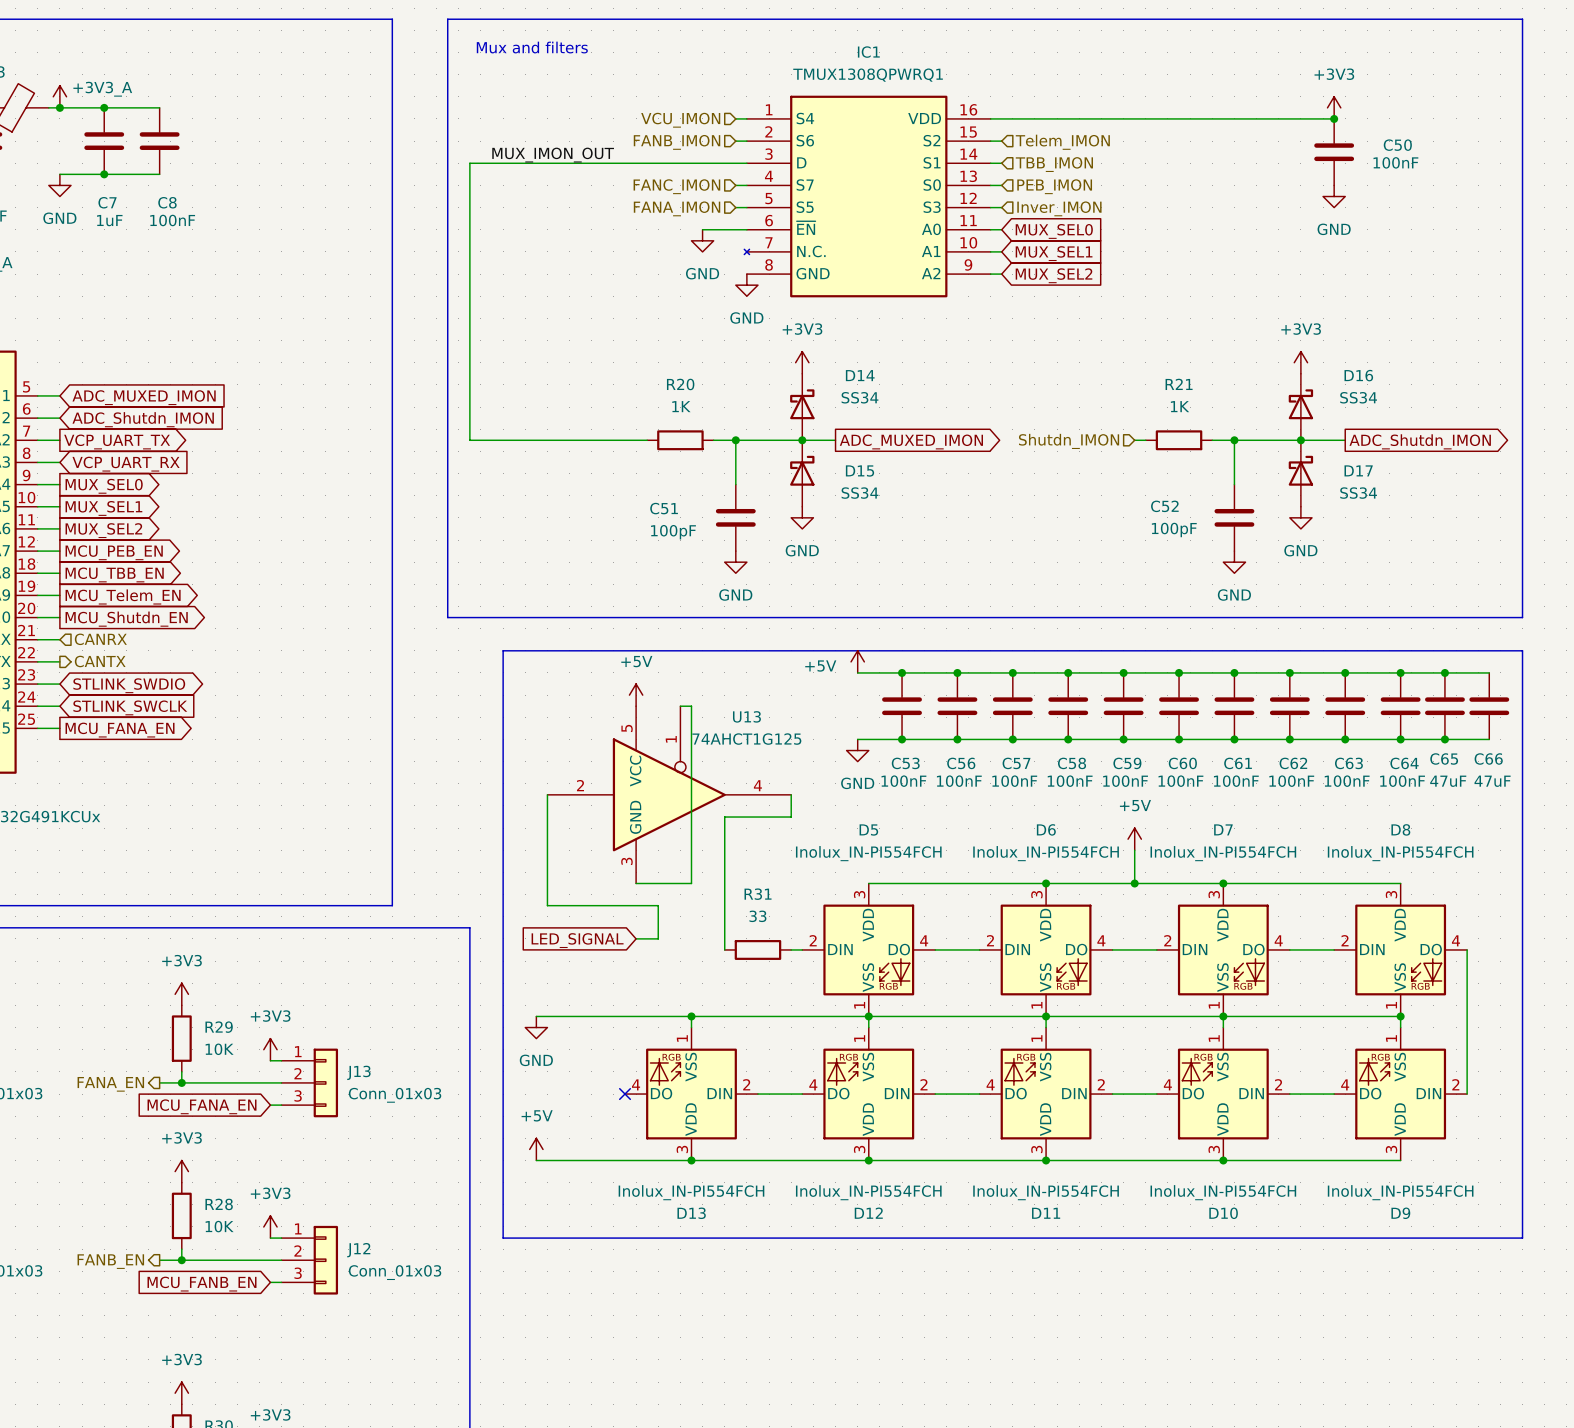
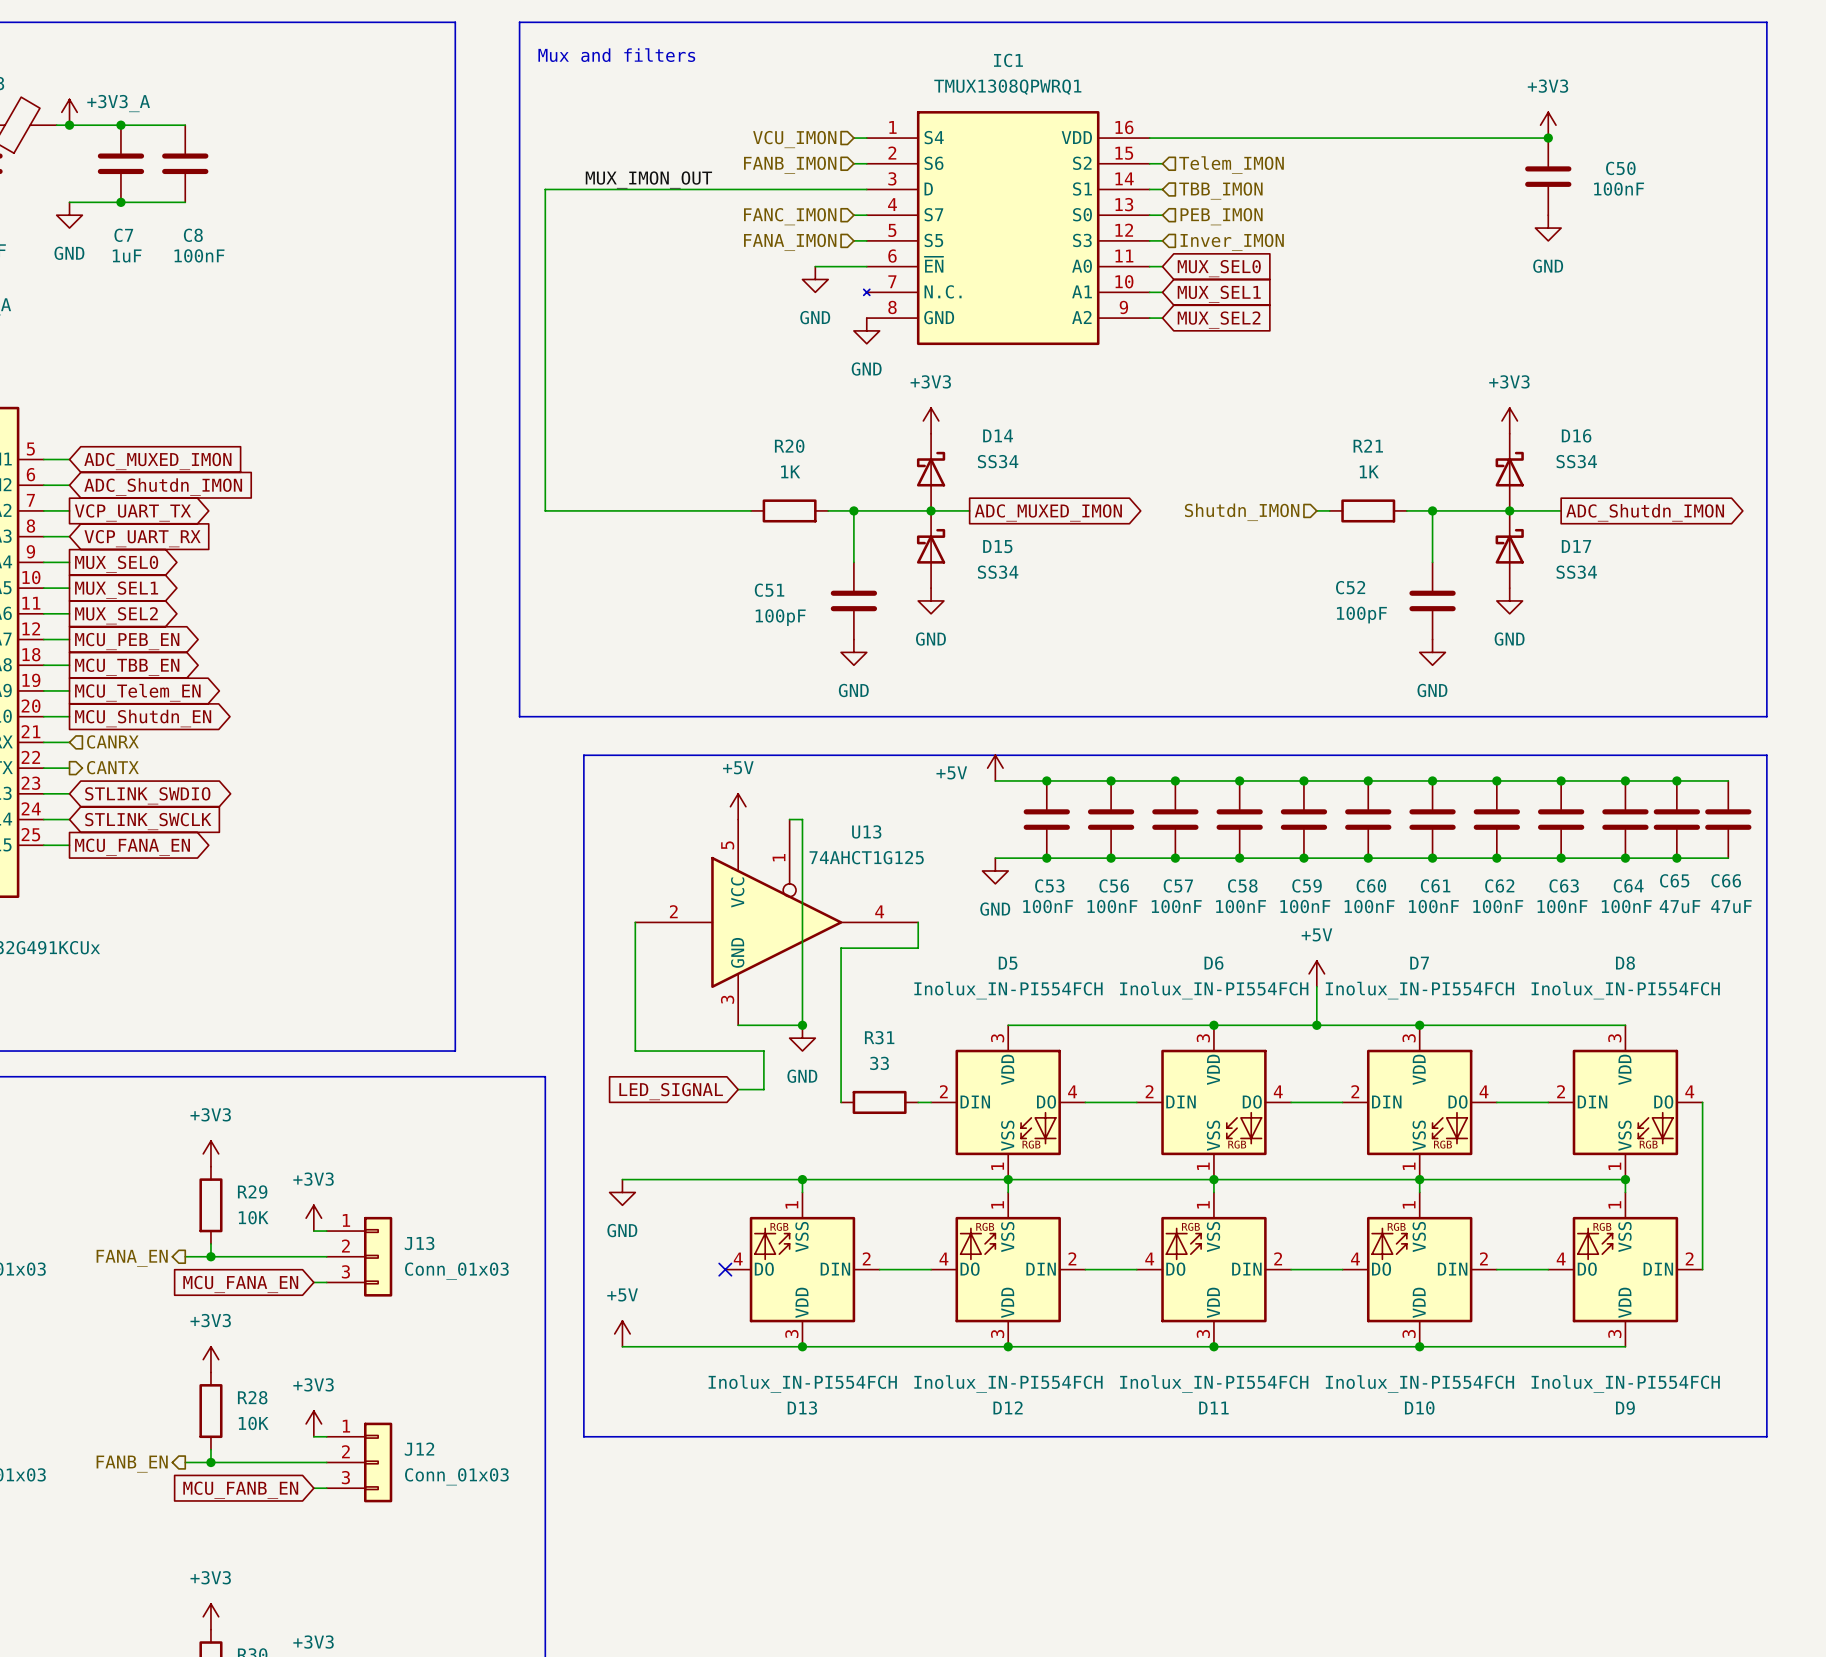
junction: none -> (802, 1025)
power symbol: none -> GND (802, 1038)

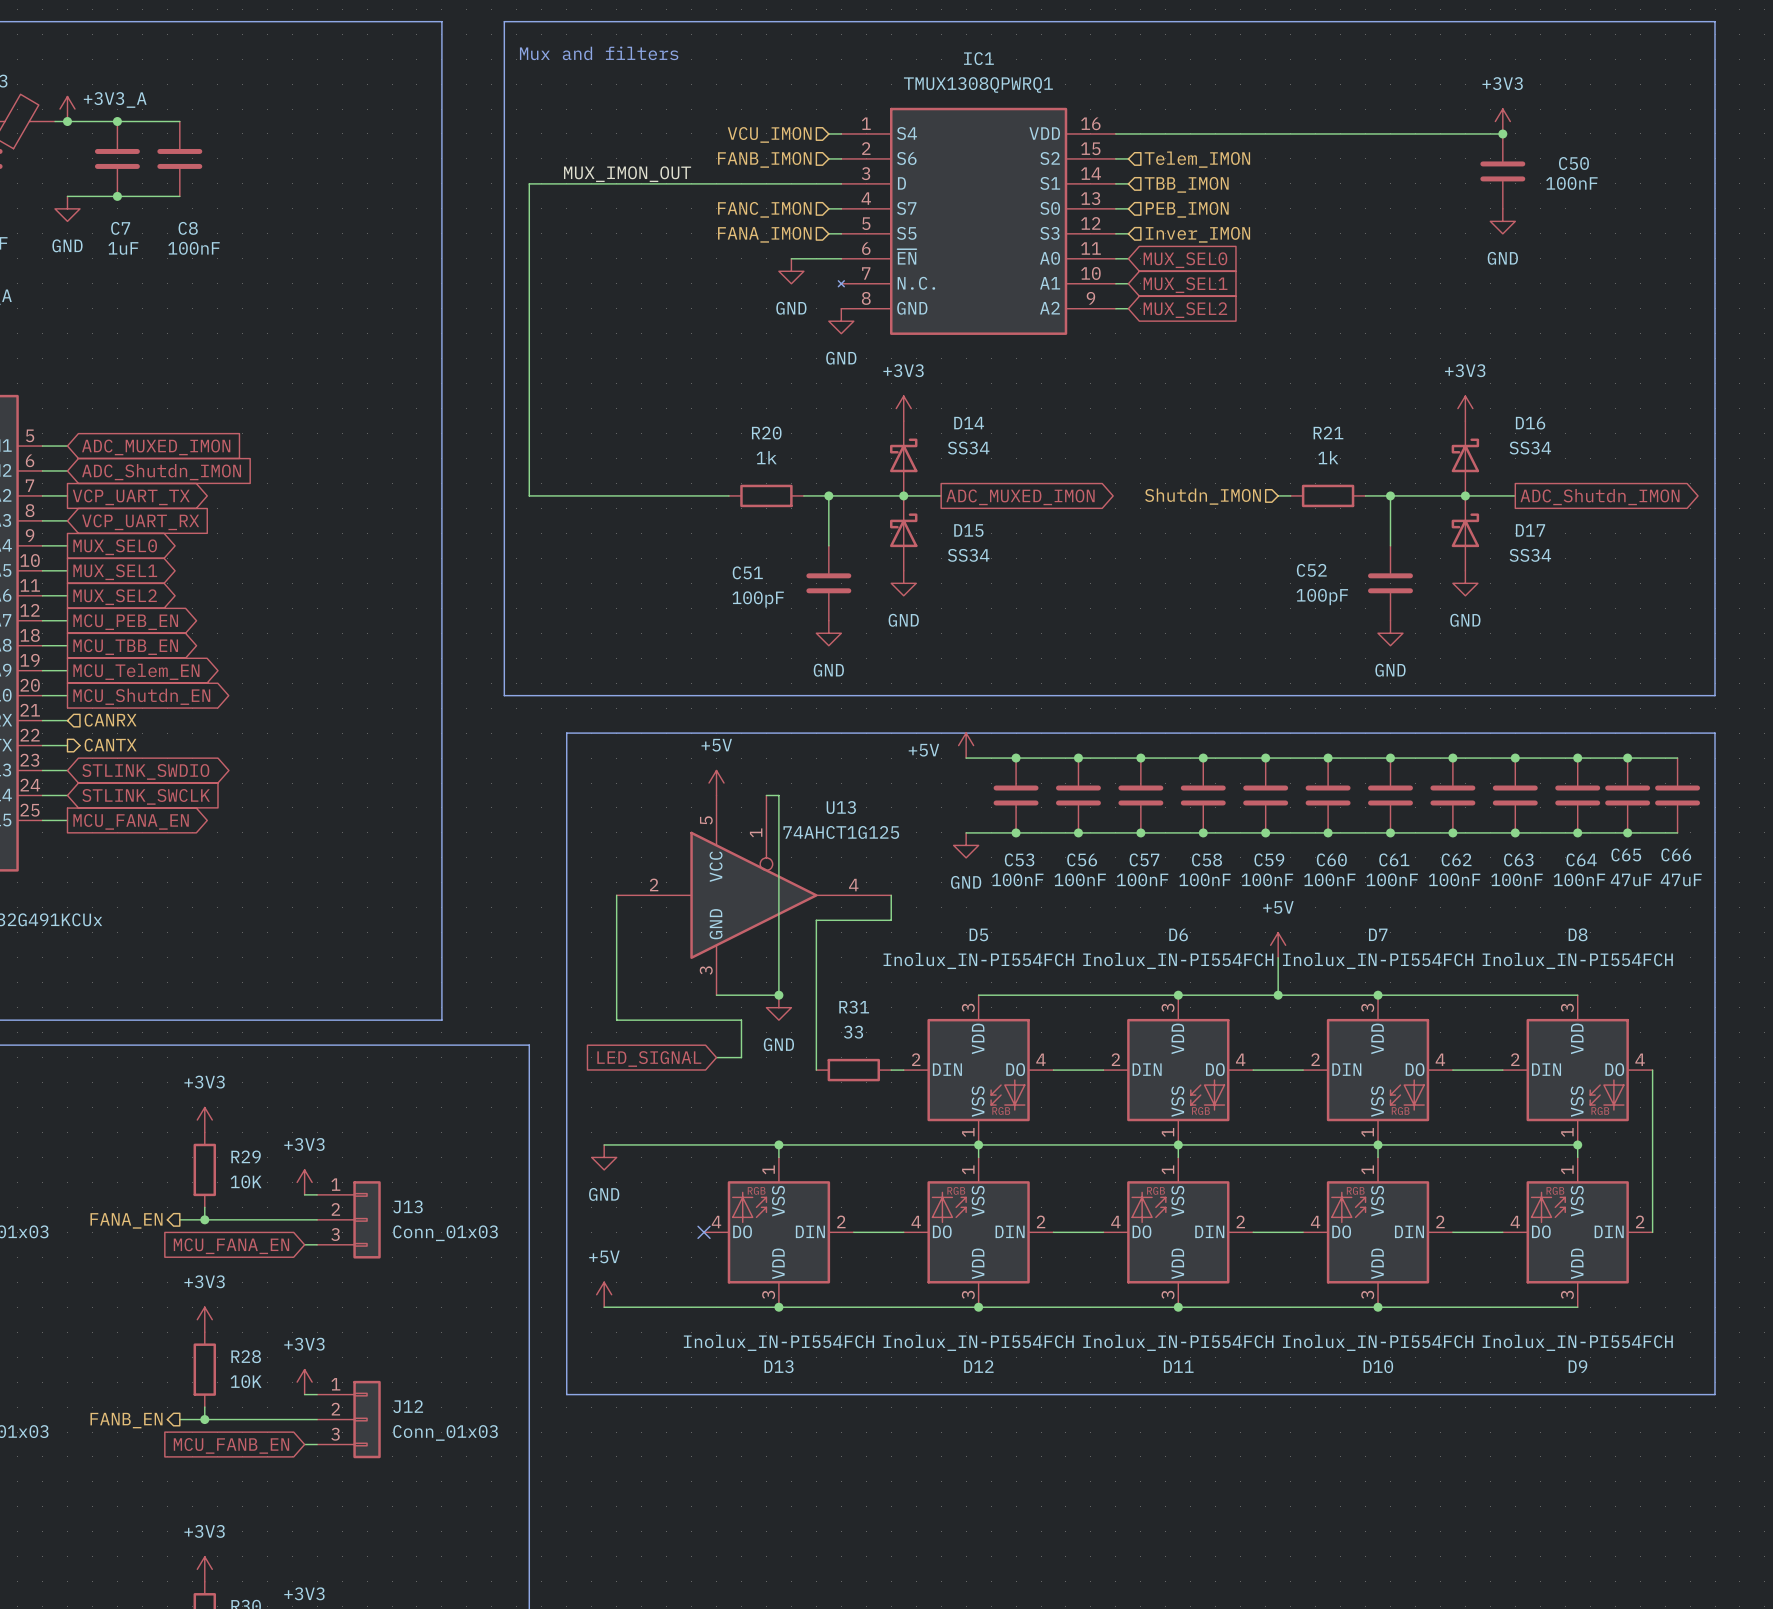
R20 value: 1K (790, 471) -> 1k (766, 457)
R21 value: 1K (1369, 471) -> 1k (1328, 457)

